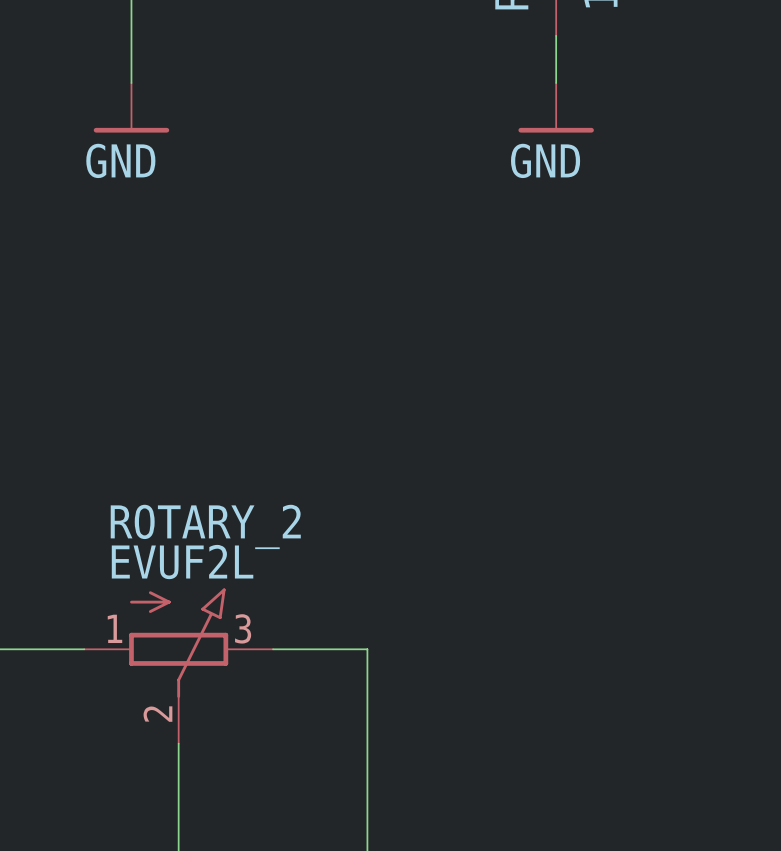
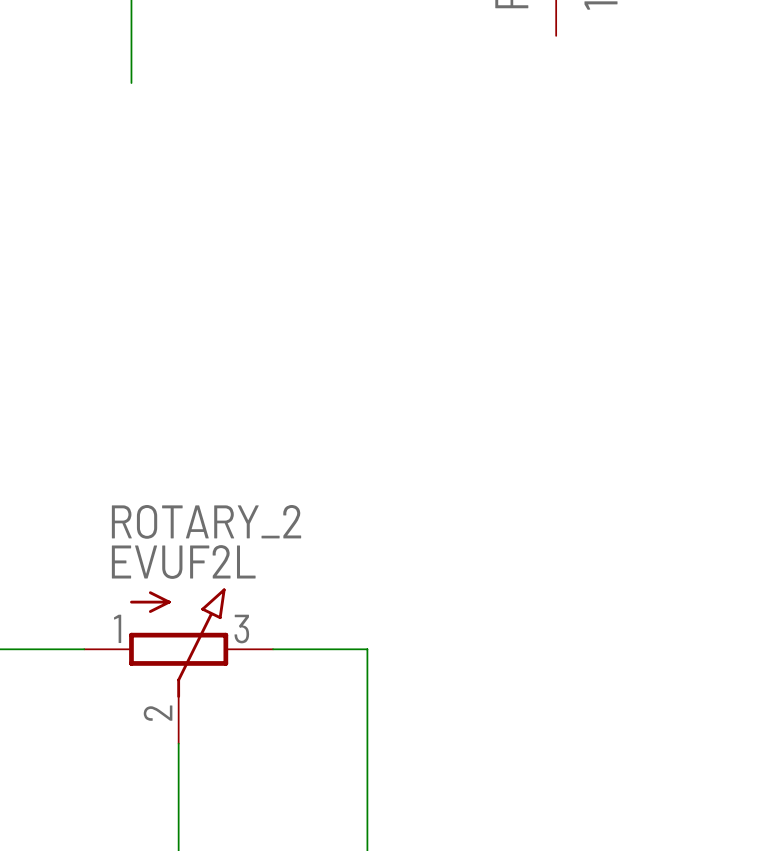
wire: (556, 35) (556, 83) -> none
power symbol: GND (131, 107) -> none
power symbol: GND (556, 107) -> none

